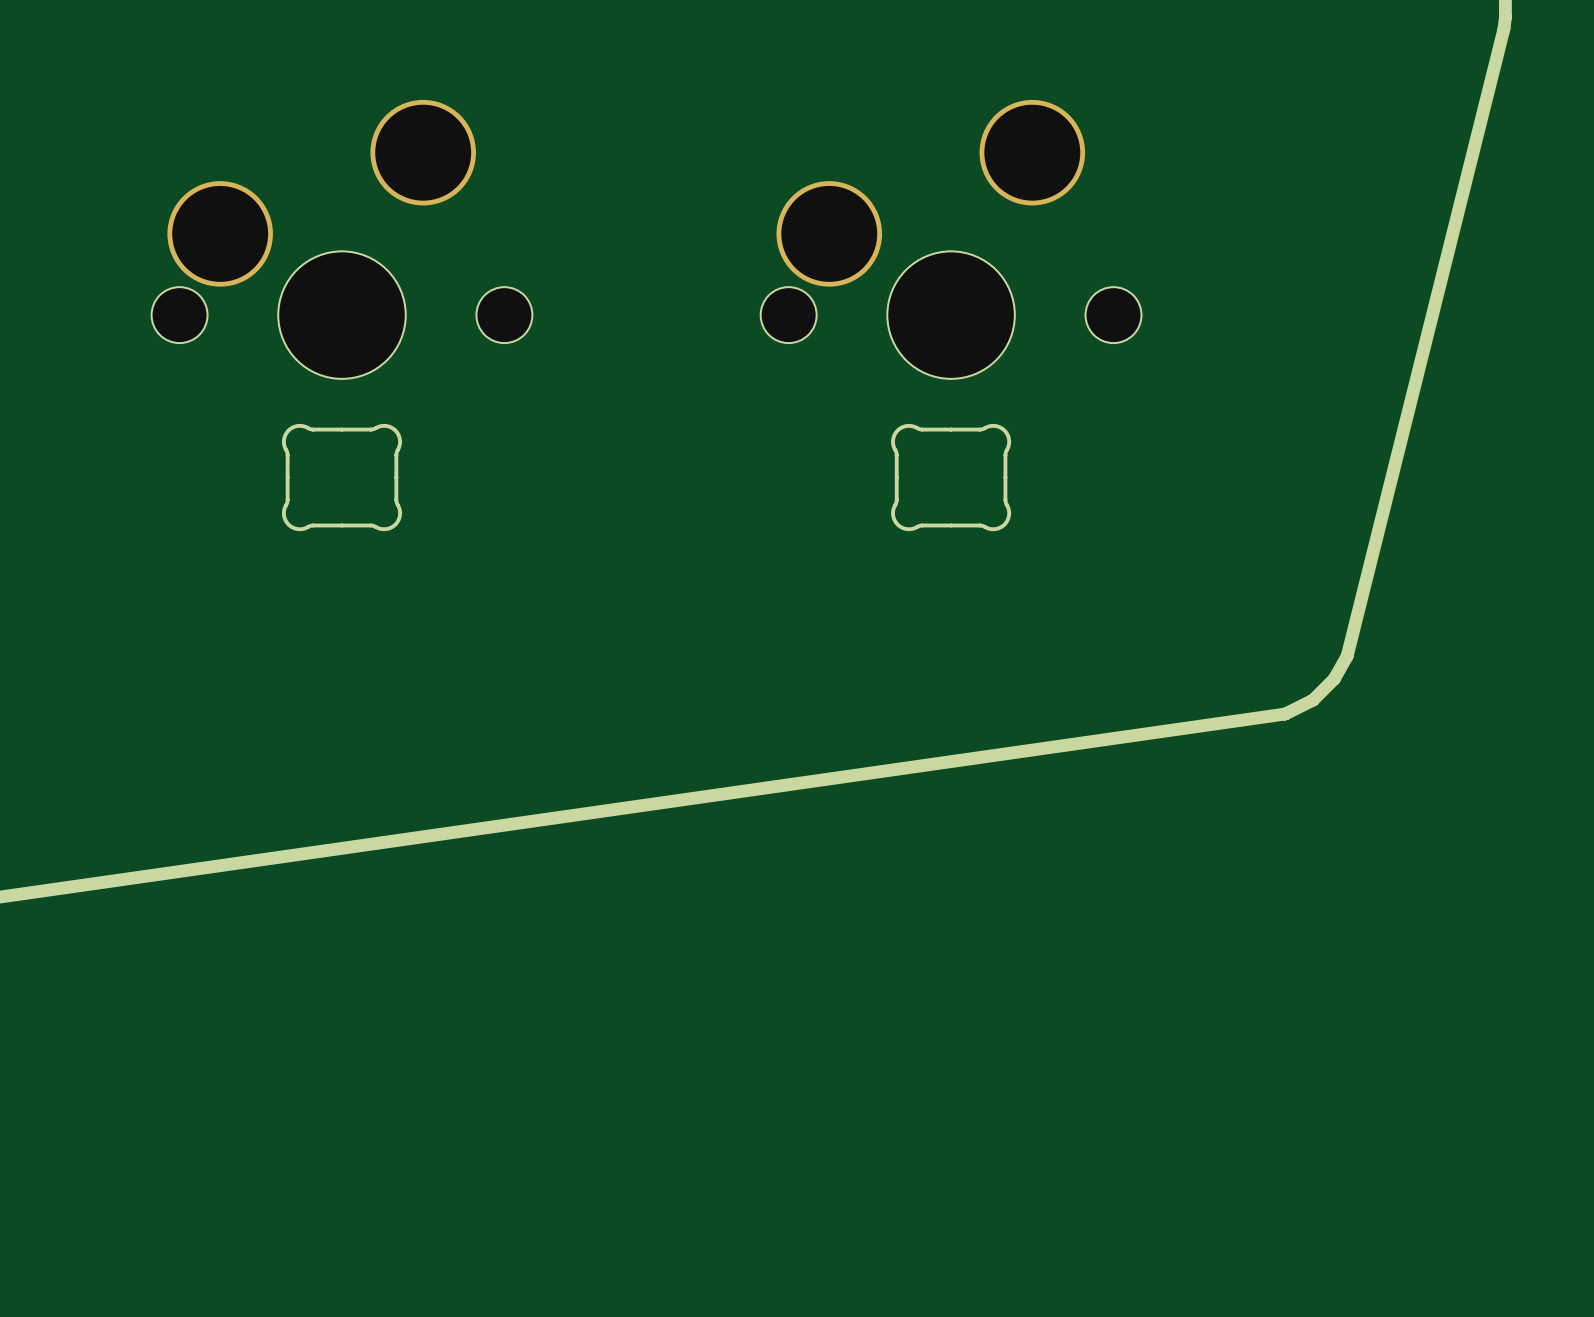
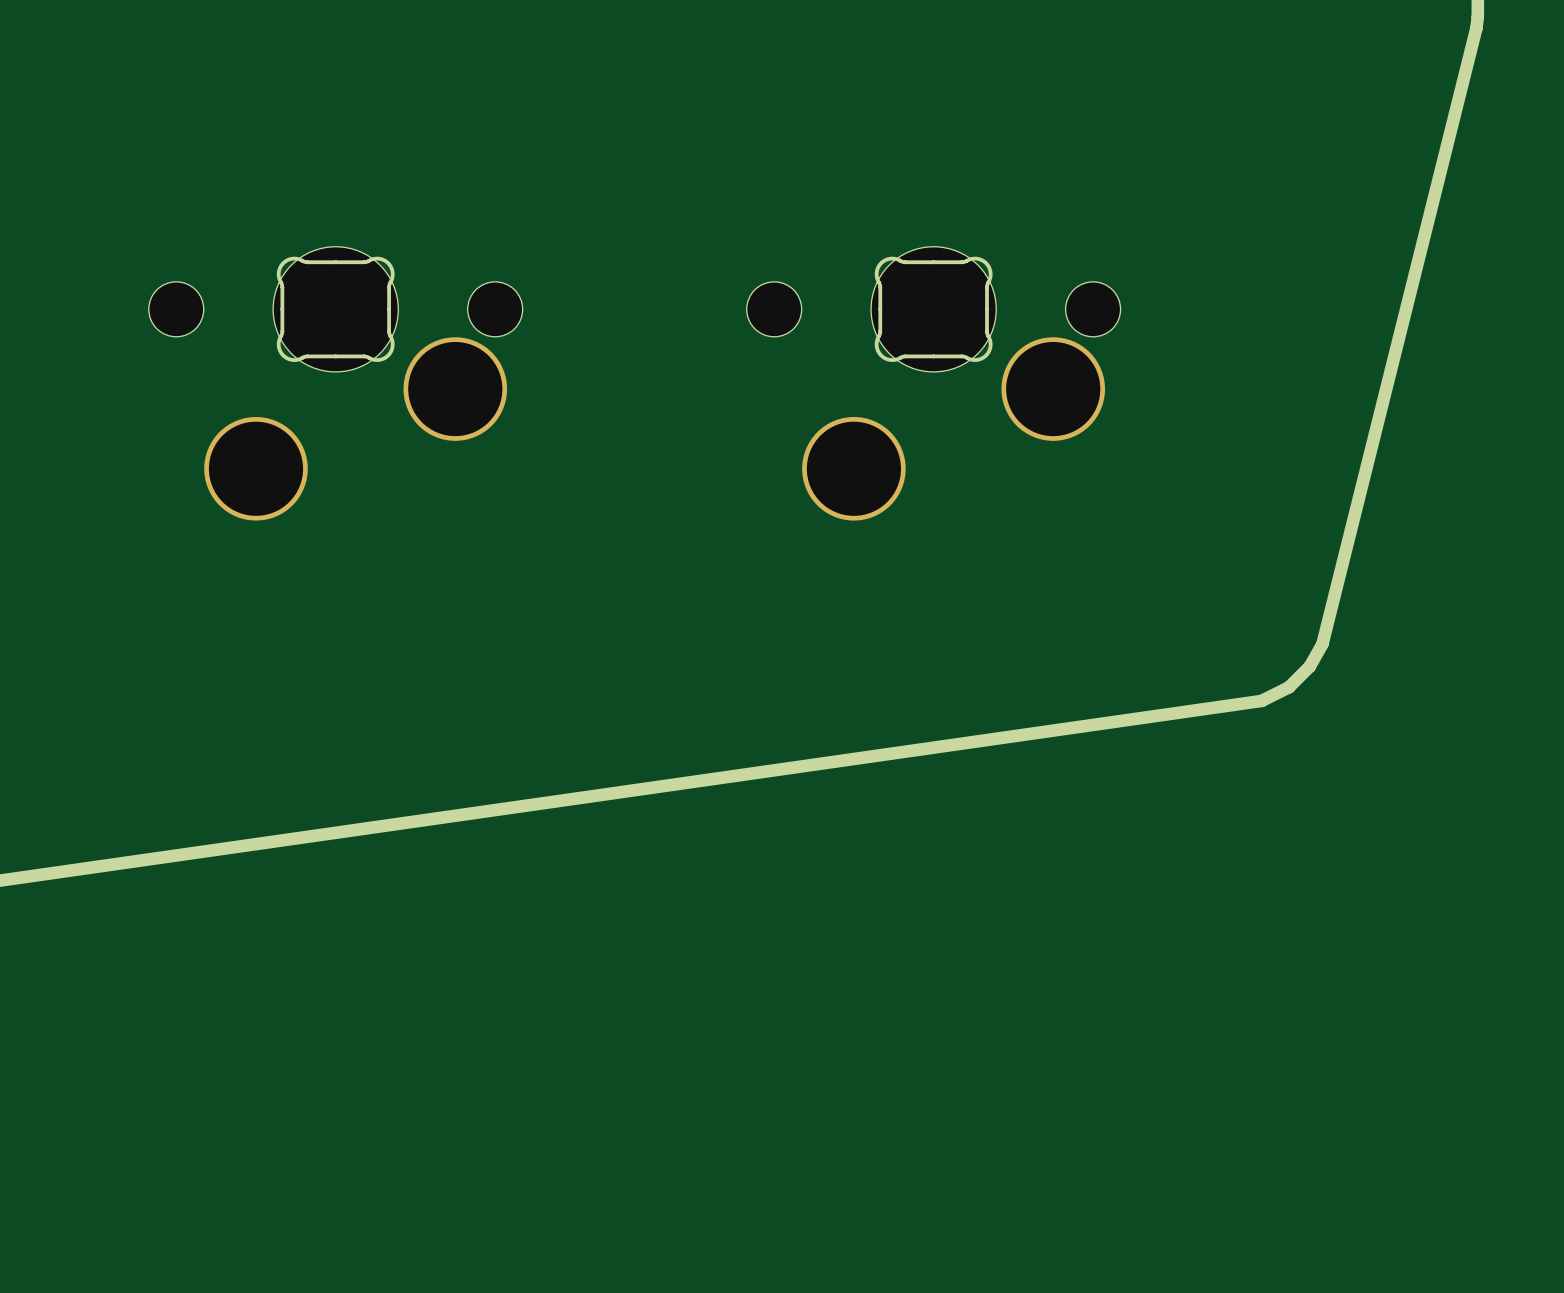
part rotation: 0° (341, 239) -> 180° (335, 383)
part rotation: 0° (951, 239) -> 180° (933, 383)
part position: (341, 477) -> (335, 309)
part position: (951, 477) -> (933, 309)

